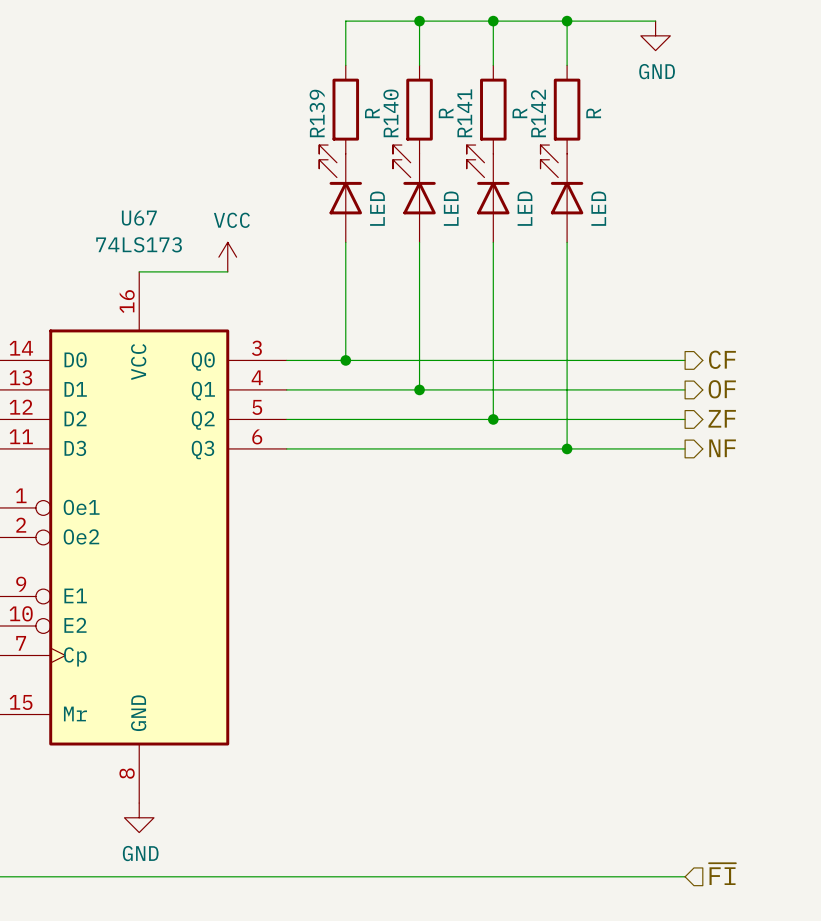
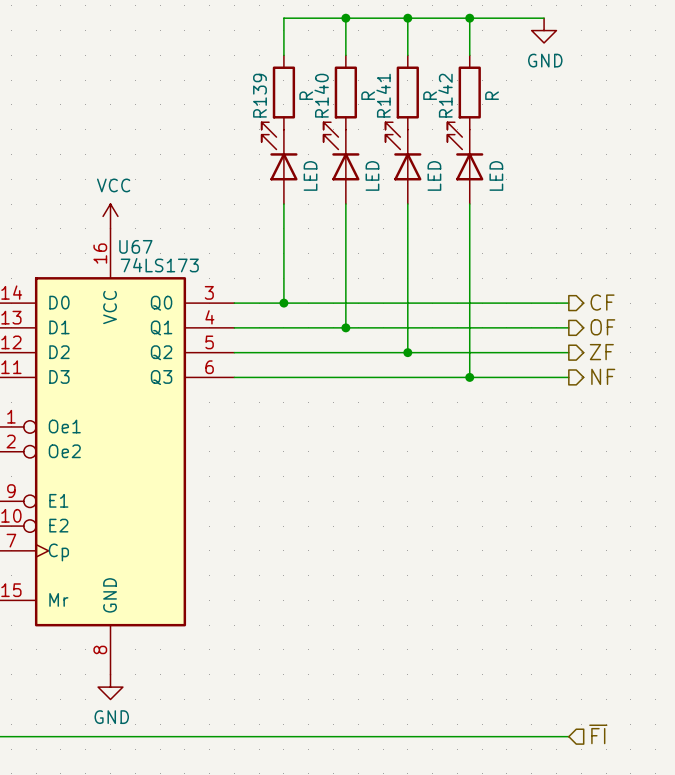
U67 name position: U67 (139, 218) -> U67 (135, 246)
U67 value position: 74LS173 (139, 244) -> 74LS173 (159, 265)
power symbol position: VCC (227, 257) -> VCC (110, 216)
wire: (139, 271) (227, 271) -> none

